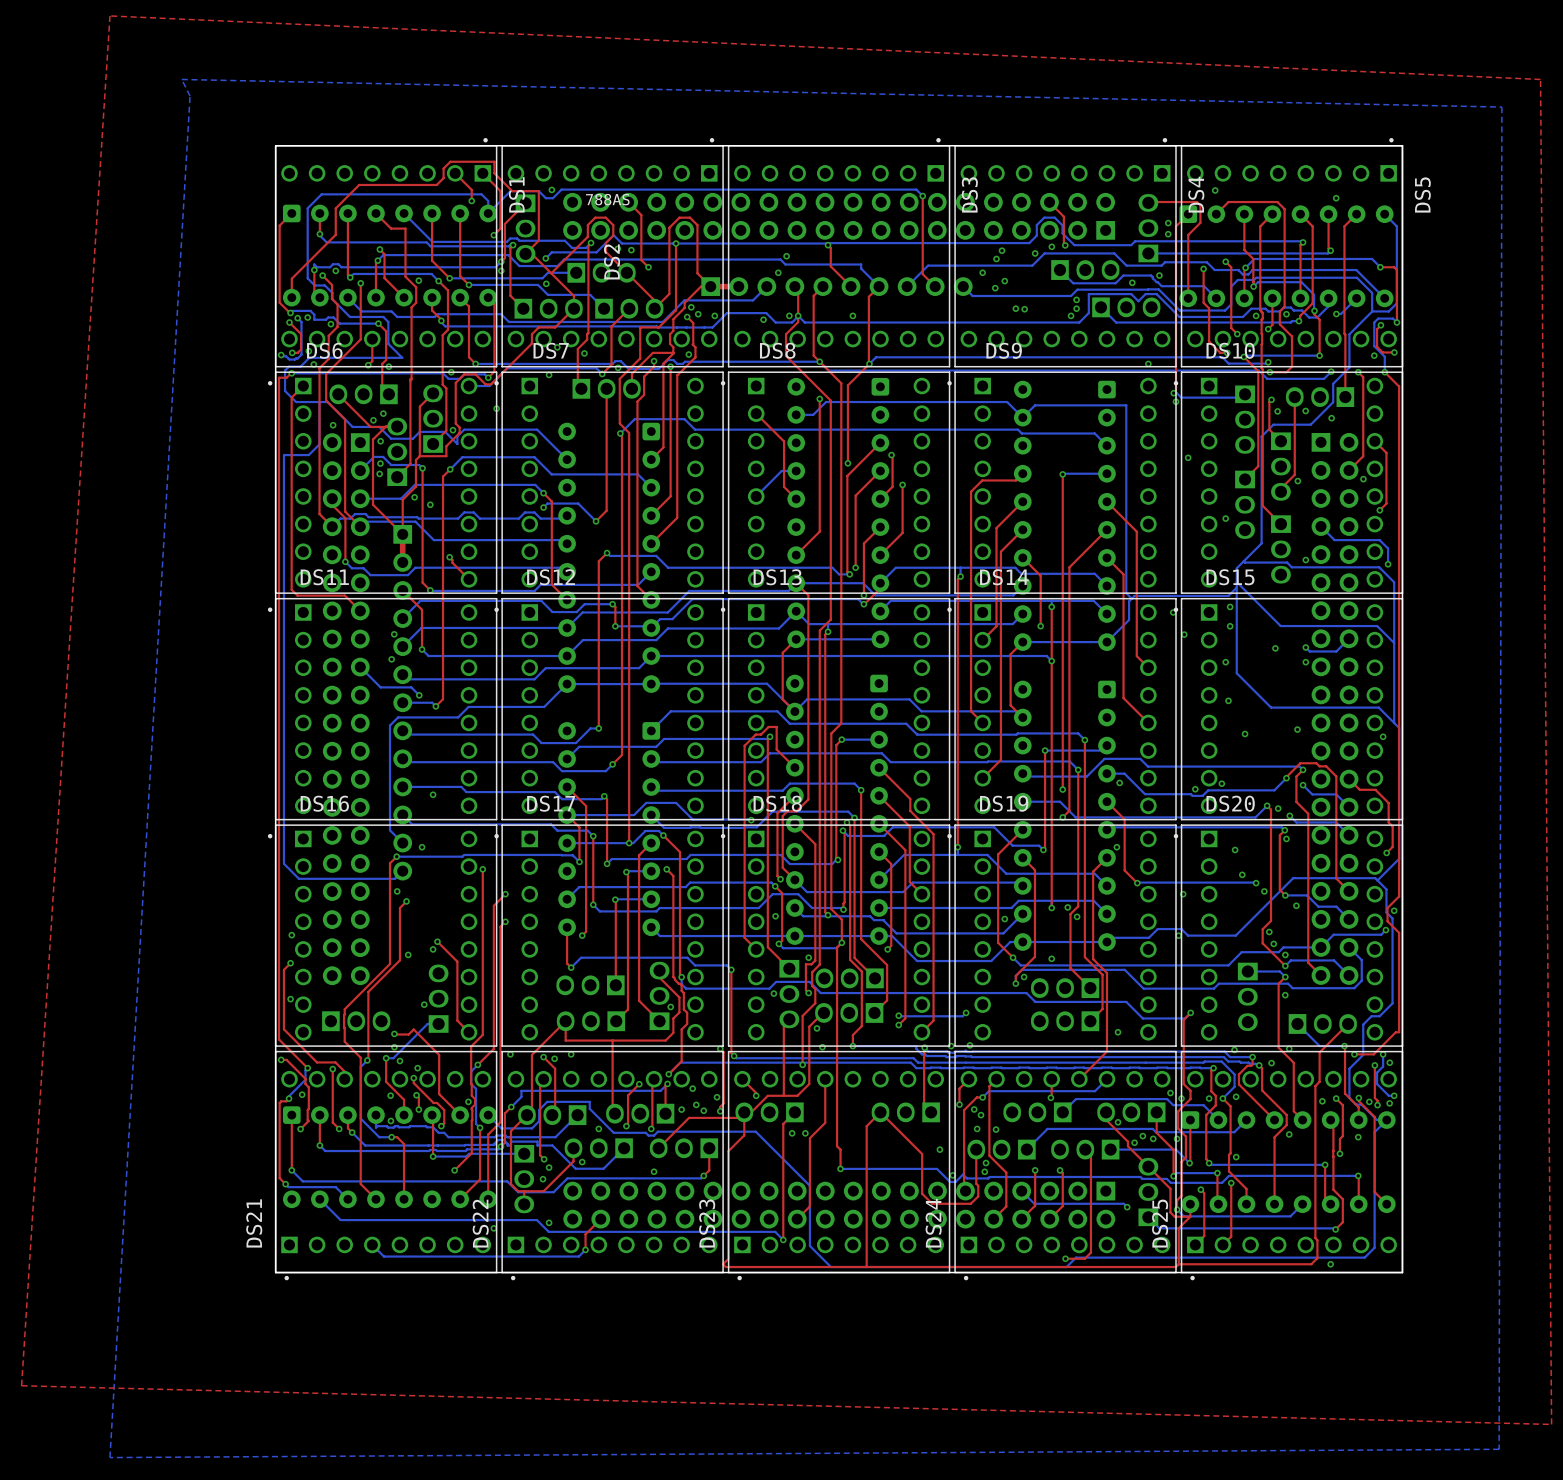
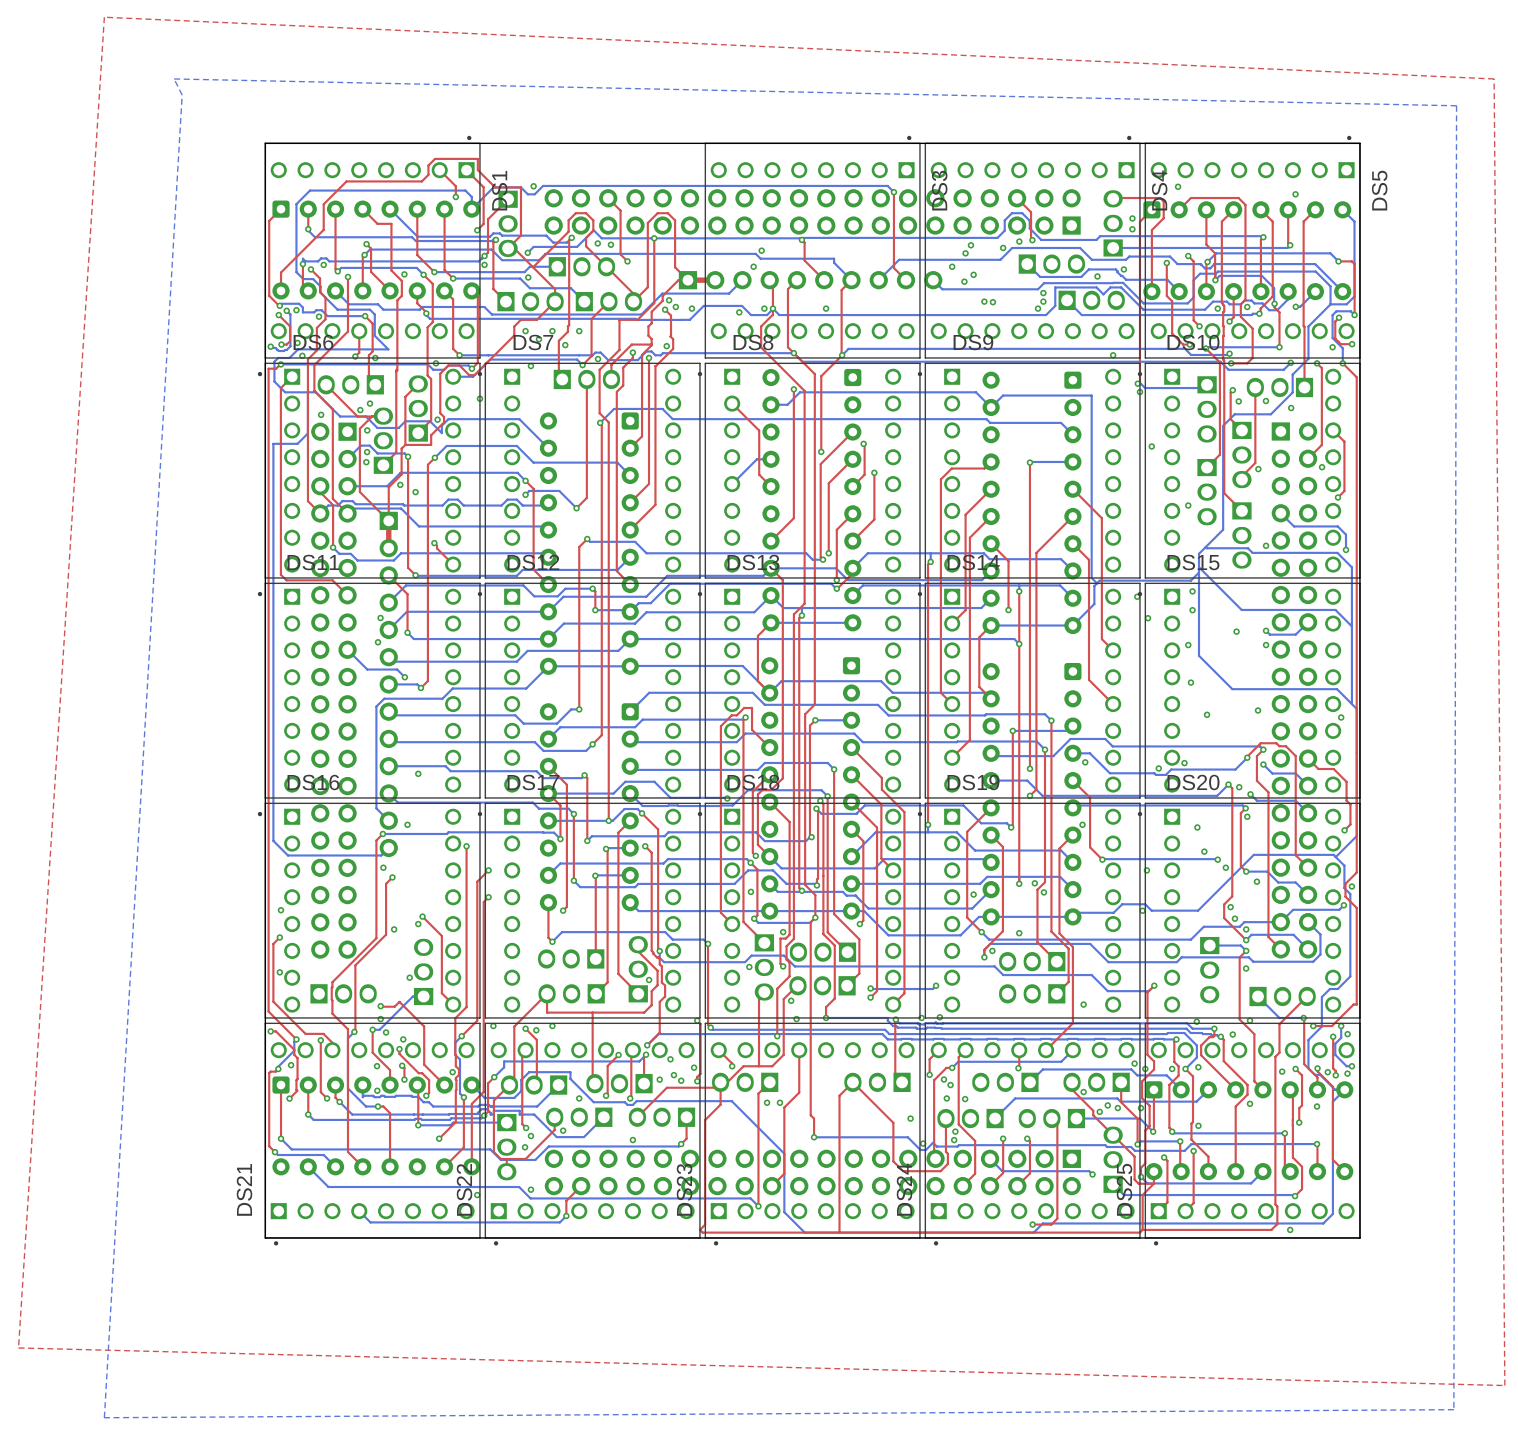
DS2: (612, 252) -> none

